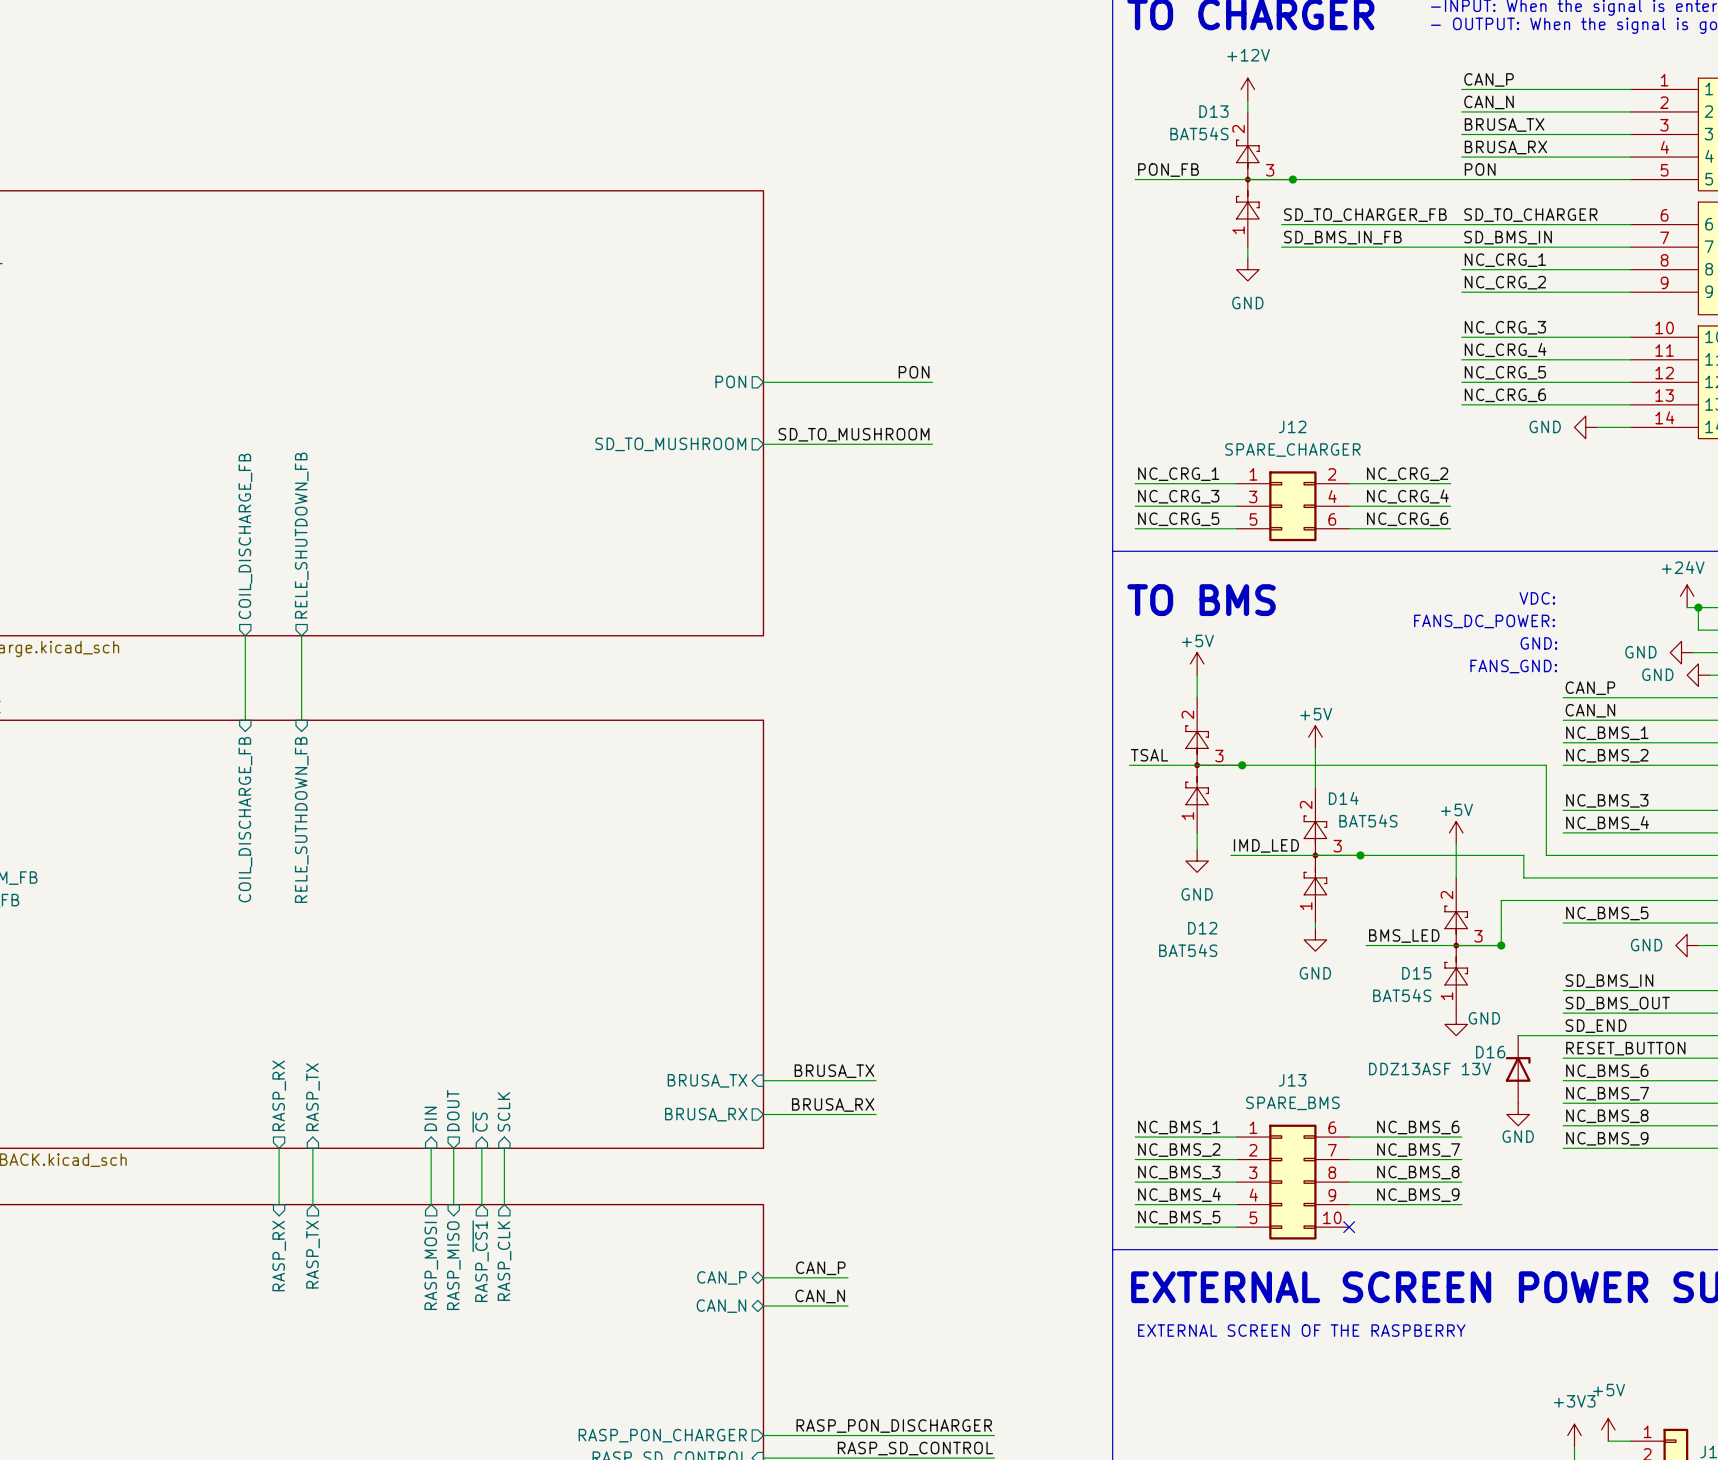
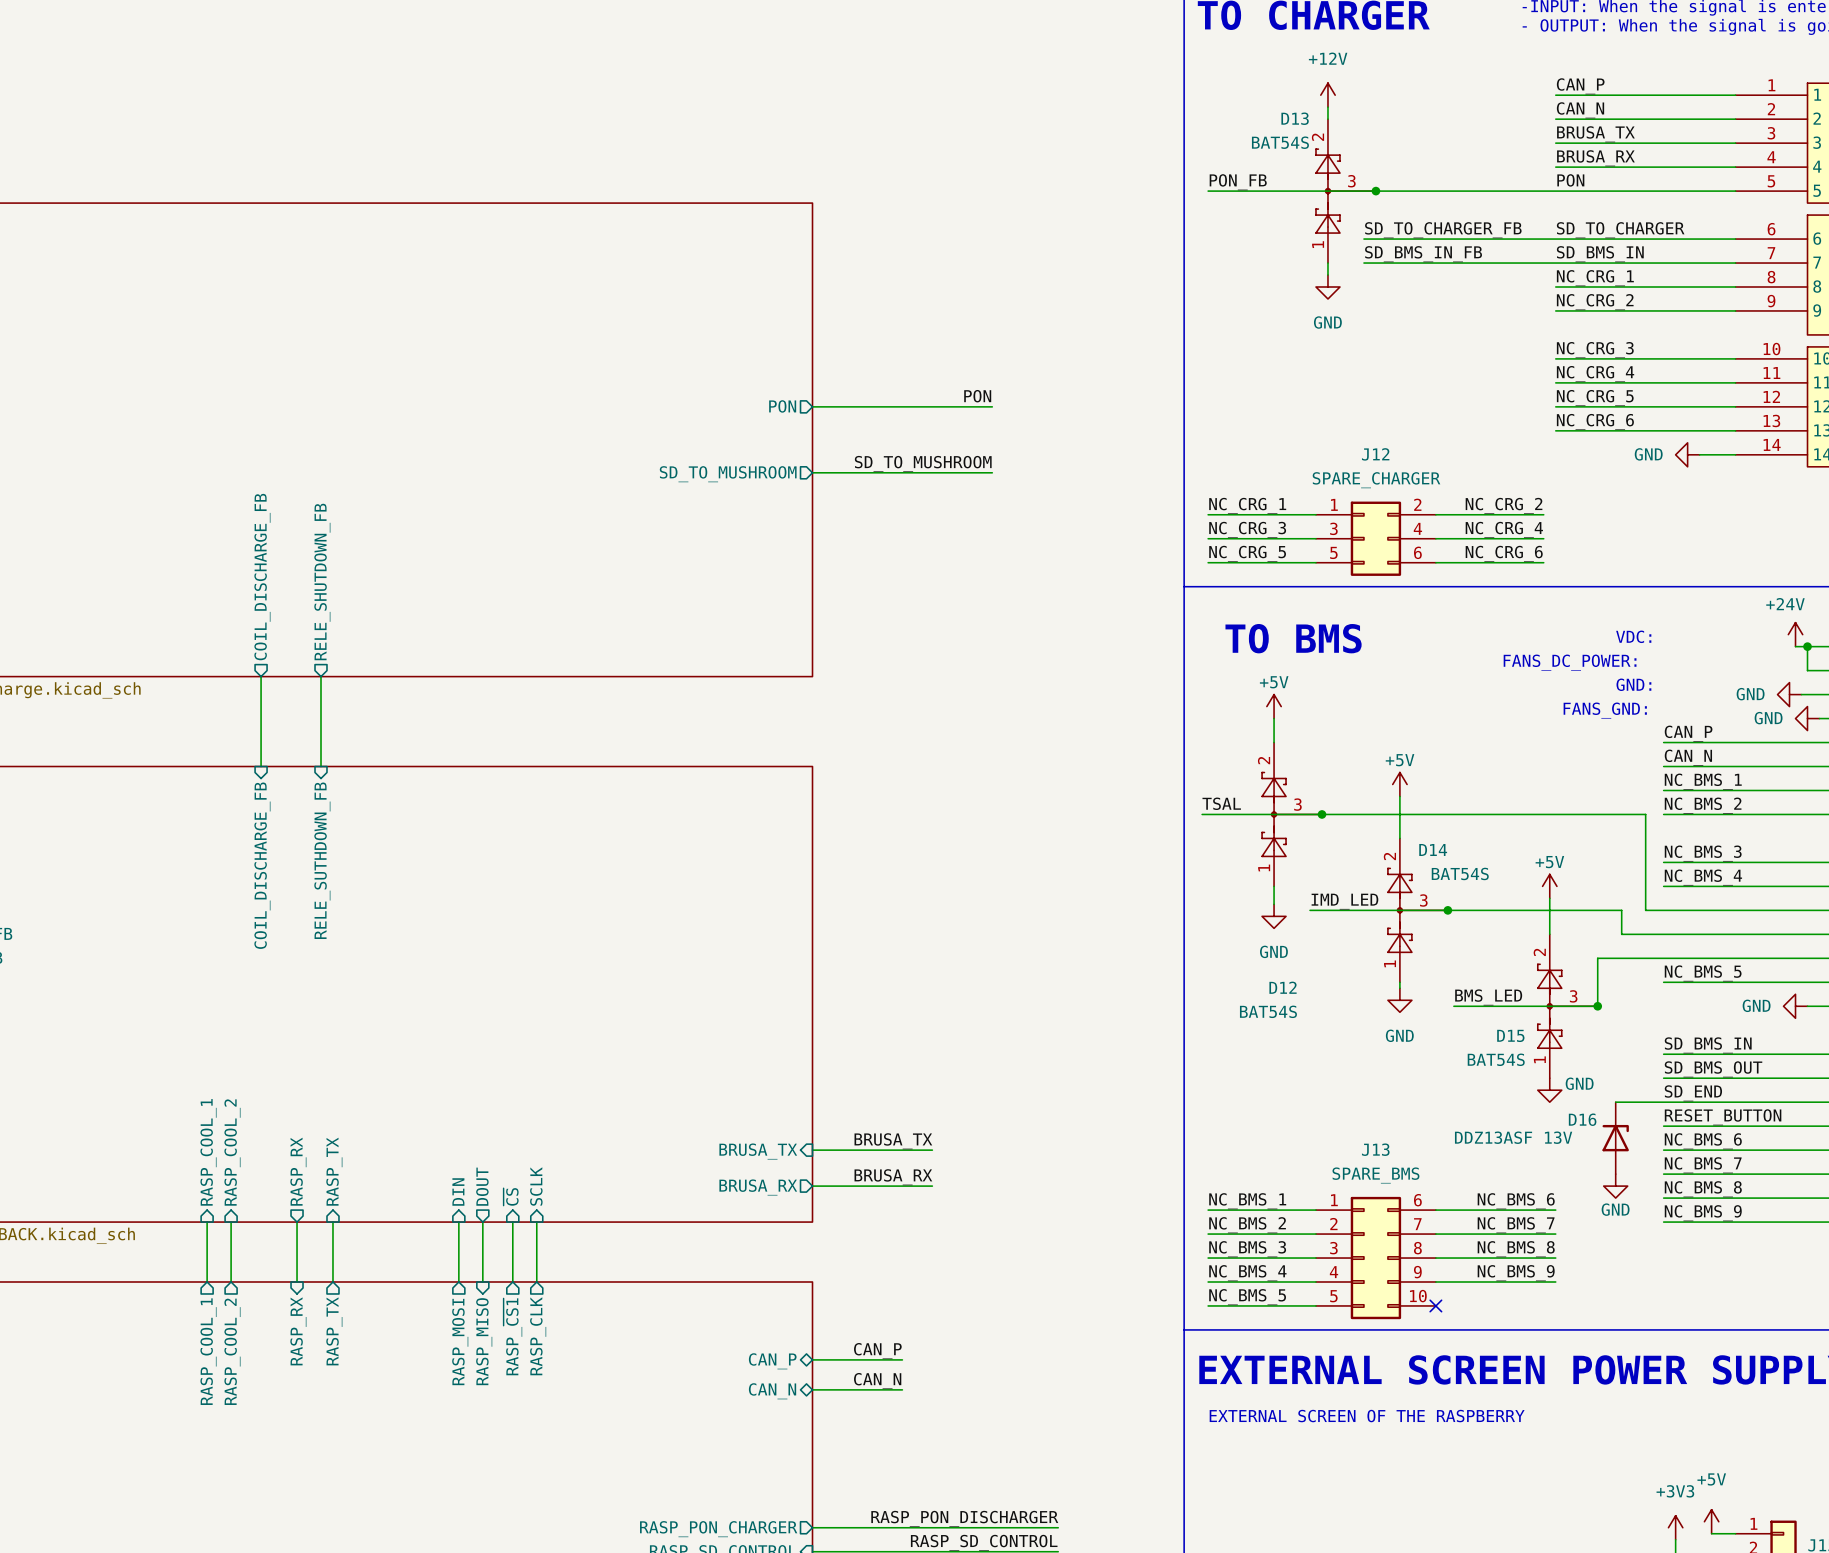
sheet pin: none -> RASP_COOL_1 (208, 1152)
sheet pin: none -> RASP_COOL_2 (232, 1152)
wire: none -> (207, 1222) (207, 1282)
wire: none -> (231, 1222) (231, 1282)
sheet pin: none -> RASP_COOL_1 (208, 1351)
sheet pin: none -> RASP_COOL_2 (232, 1351)

